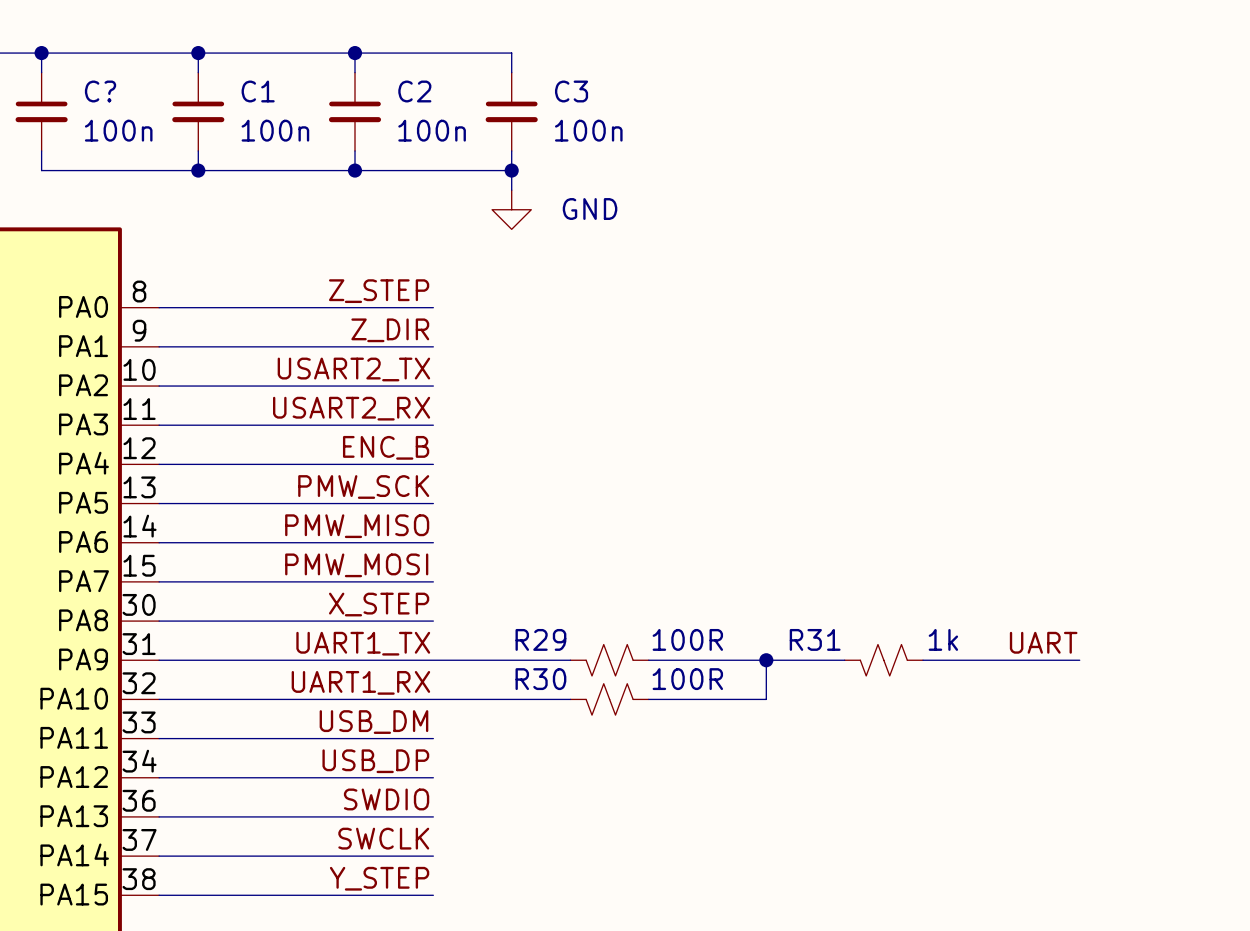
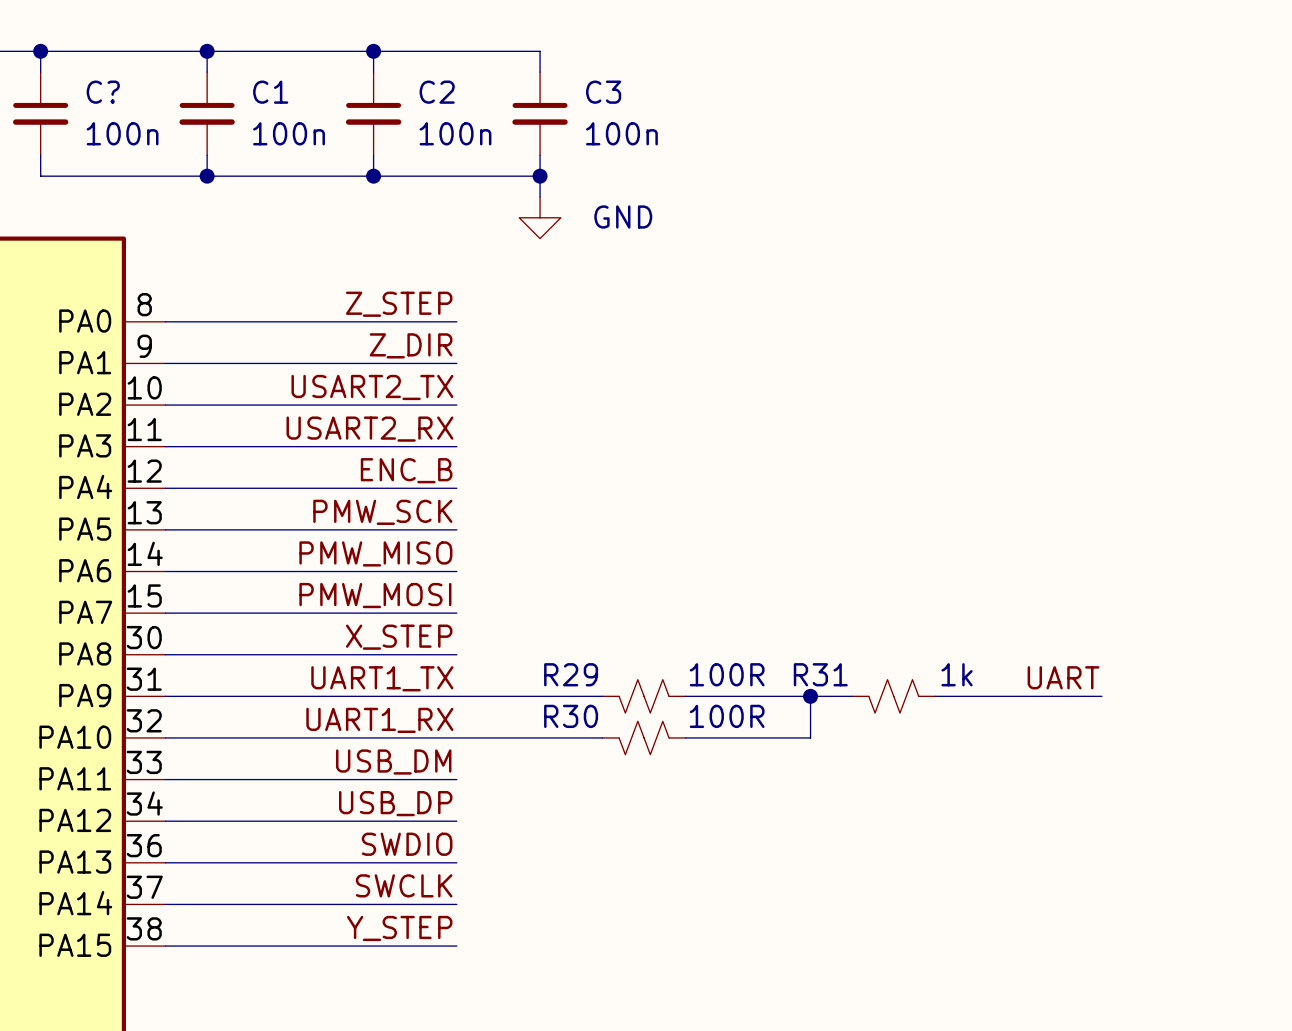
label position: UART (1043, 642) -> UART (1063, 677)
wire: (805, 660) (844, 660) -> (935, 696) (976, 696)
R31 position: (883, 660) -> (893, 696)
wire: (1040, 660) (1079, 660) -> none

